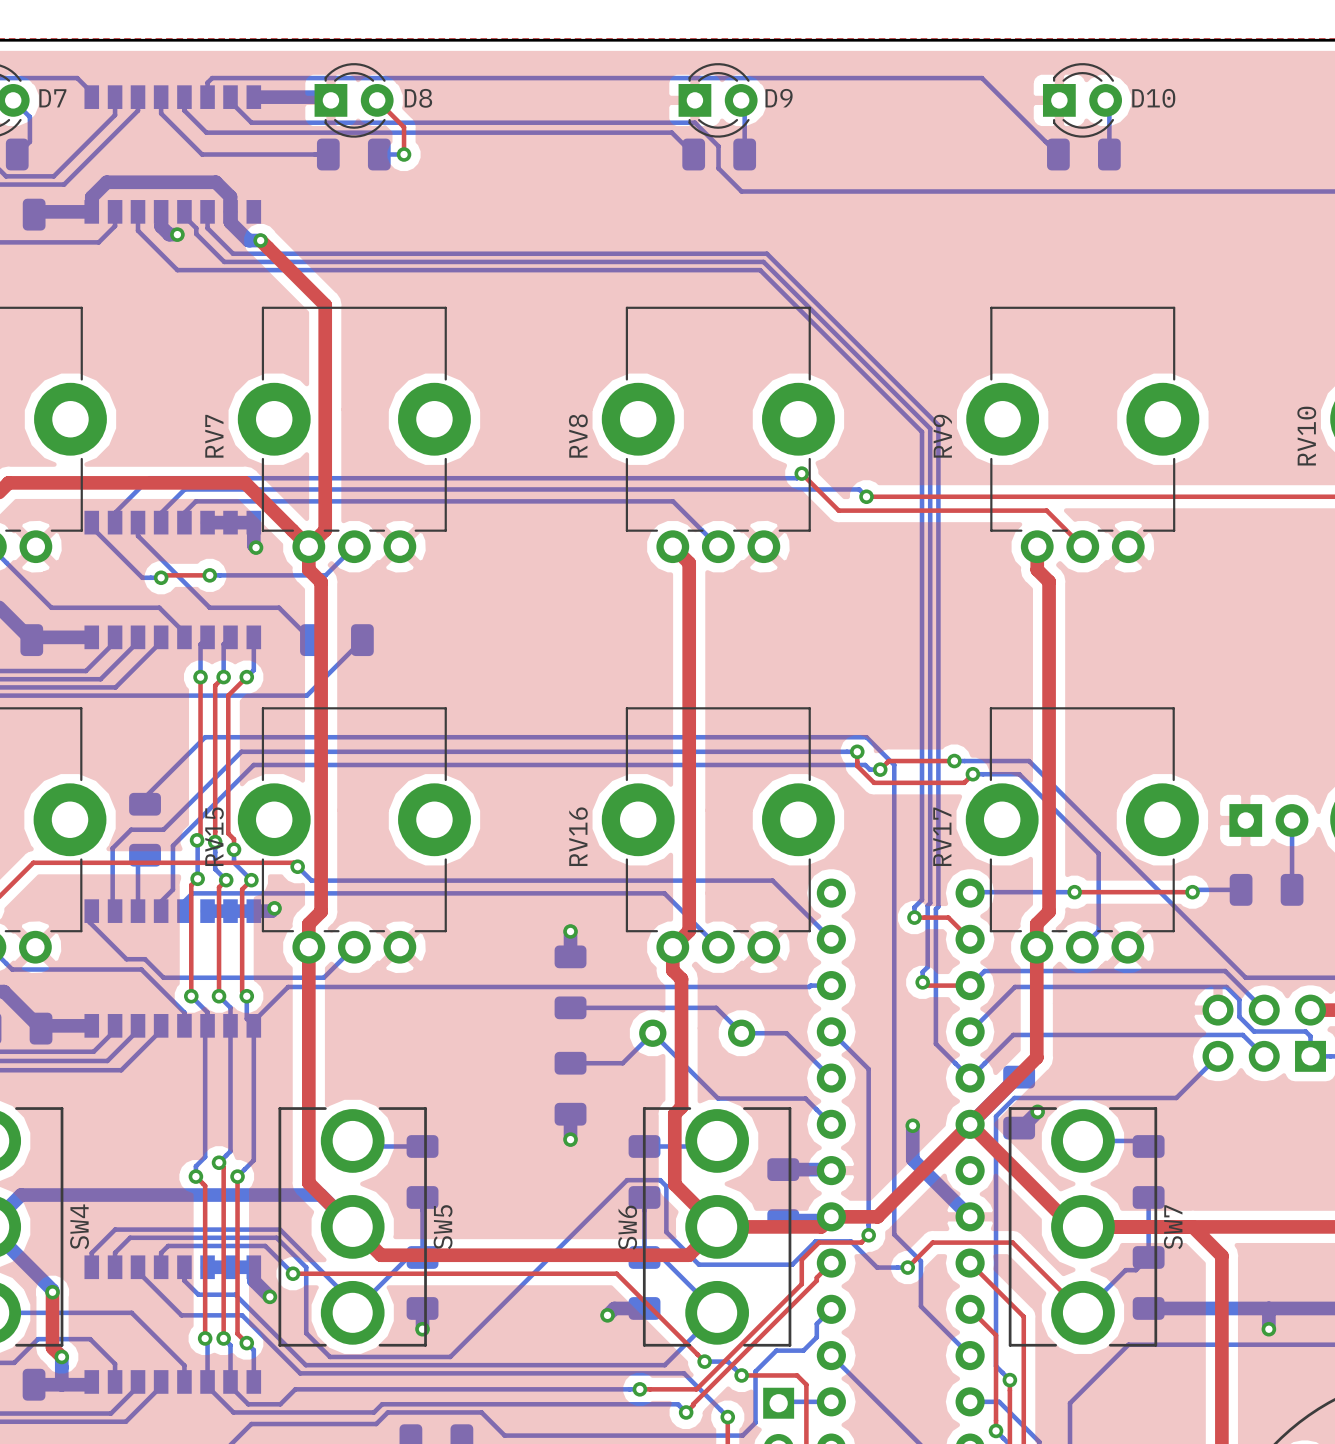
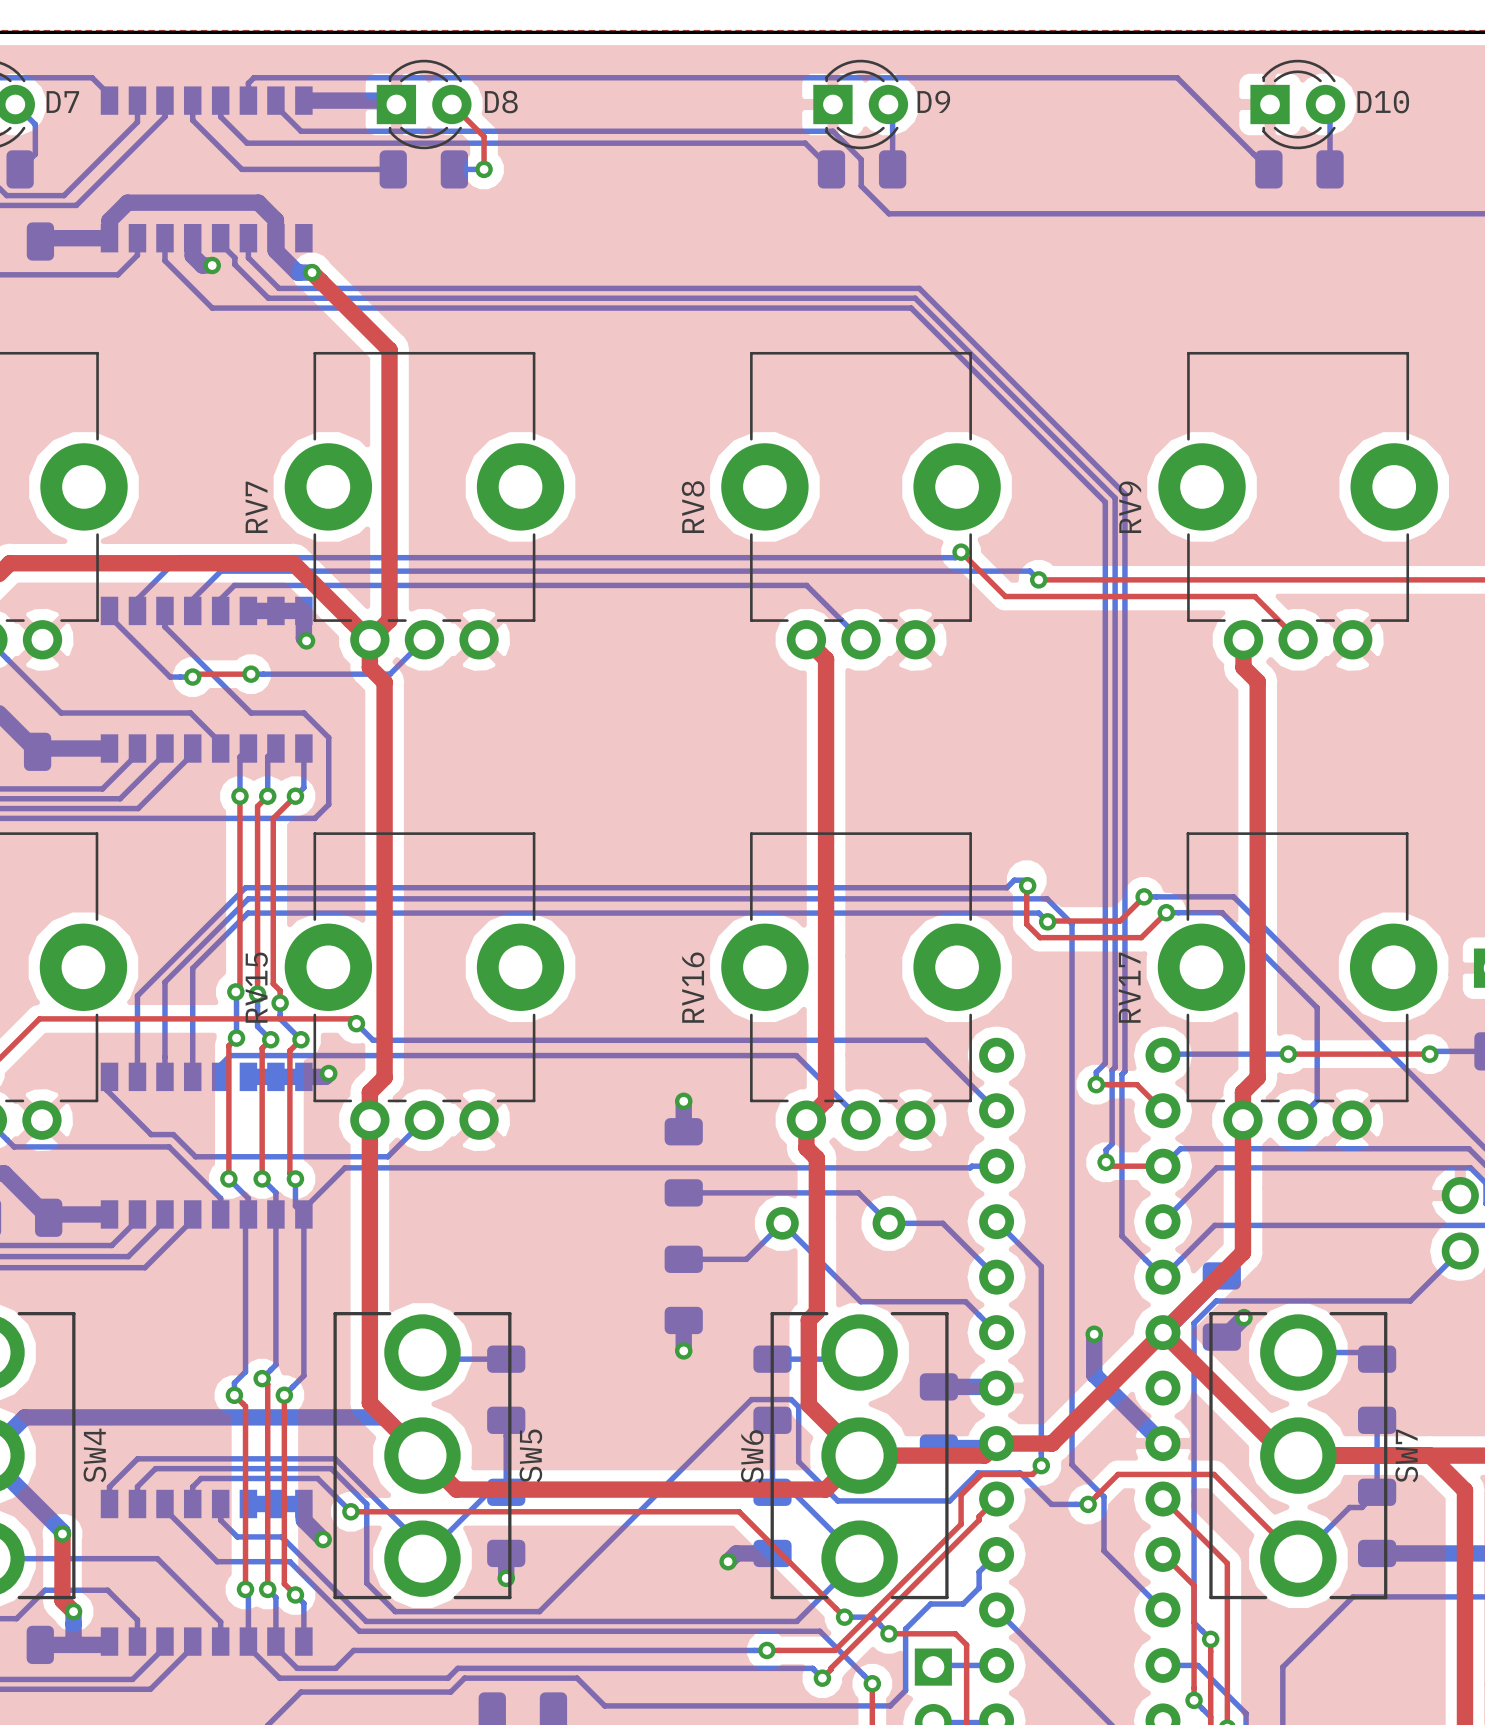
bottom track: (253, 607) (279, 607) (311, 640) -> (304, 713) (328, 737) (328, 804) (314, 818)
part: (336, 640) -> none
bottom track: (362, 640) (306, 695) (262, 695) -> none
bottom track: (857, 751) (241, 751) (163, 829) (131, 829) (112, 848) (112, 903) (115, 906) -> (1026, 880) (1014, 880) (1006, 887) (245, 887) (137, 995) (137, 1070)
top track: (857, 751) (857, 766) (874, 782) (964, 782) -> (1026, 880) (1026, 924) (1040, 937) (1141, 937) (1156, 923)
top track: (954, 761) (888, 761) (880, 769) -> (1144, 896) (1119, 921) (1047, 921)
bottom track: (880, 769) (869, 769) (865, 764) (253, 764) (172, 845) (172, 889) (161, 901) -> (1047, 921) (1038, 913) (247, 913) (192, 968) (192, 1065)
via position: (880, 769) -> (1047, 921)
bottom track: (894, 783) (894, 764) (866, 737) (205, 737) (145, 797) (145, 804) -> (1072, 923) (1047, 898) (248, 898) (164, 982) (164, 1018)
part: (145, 829) -> none

